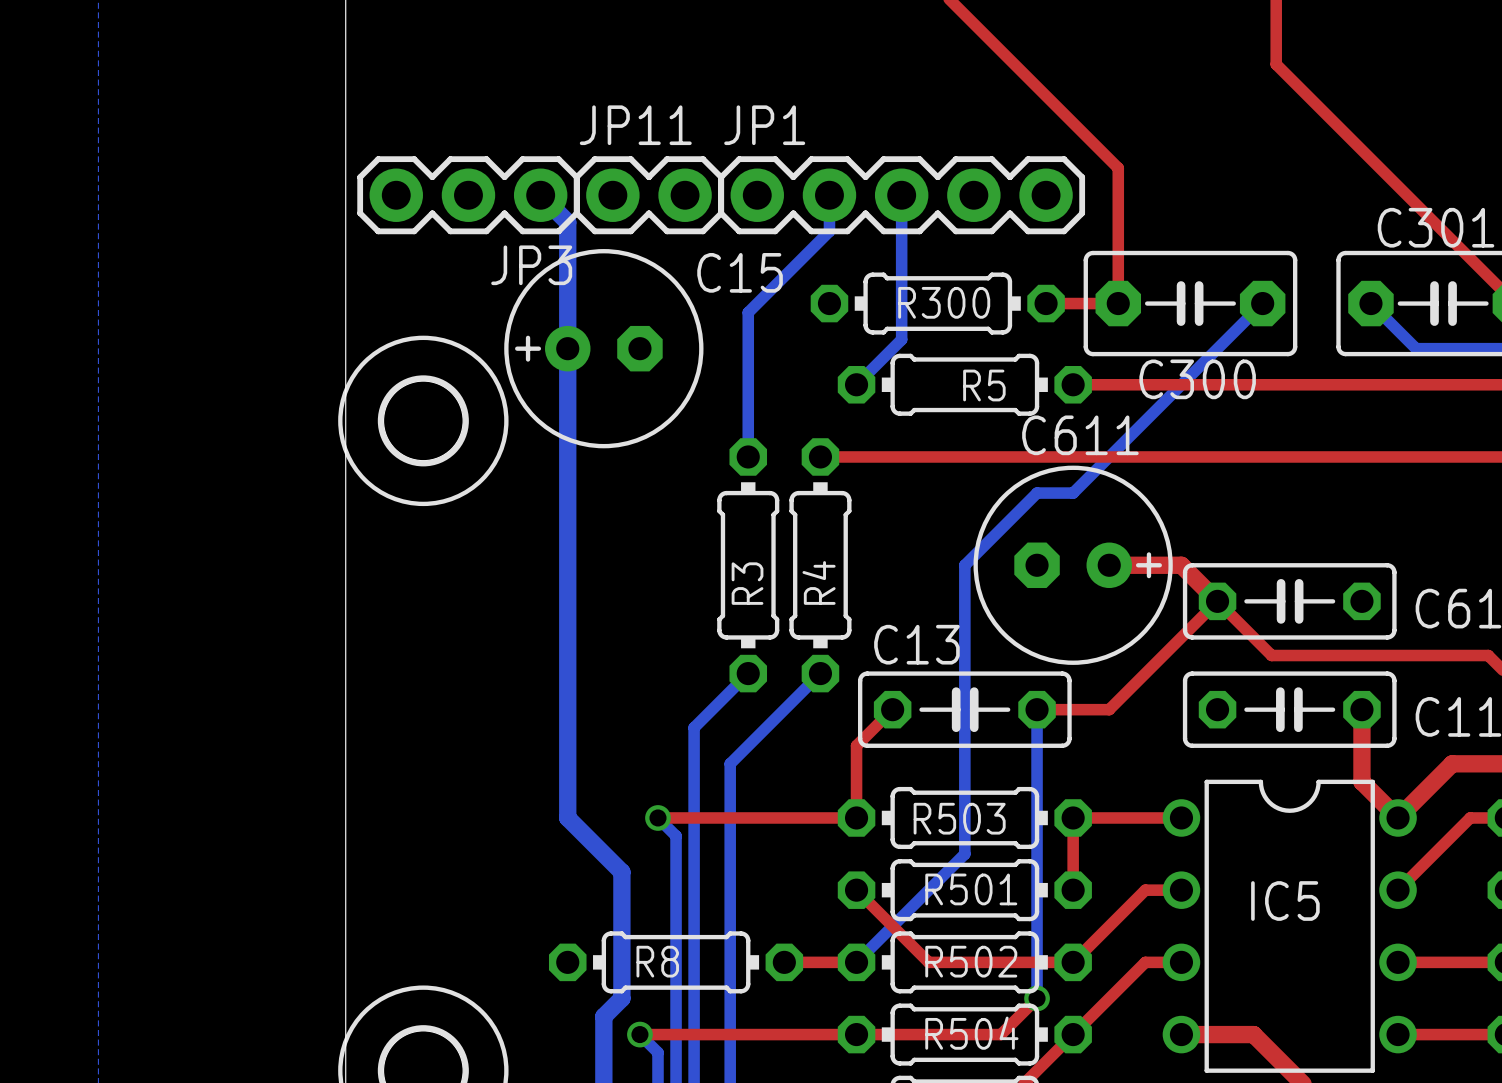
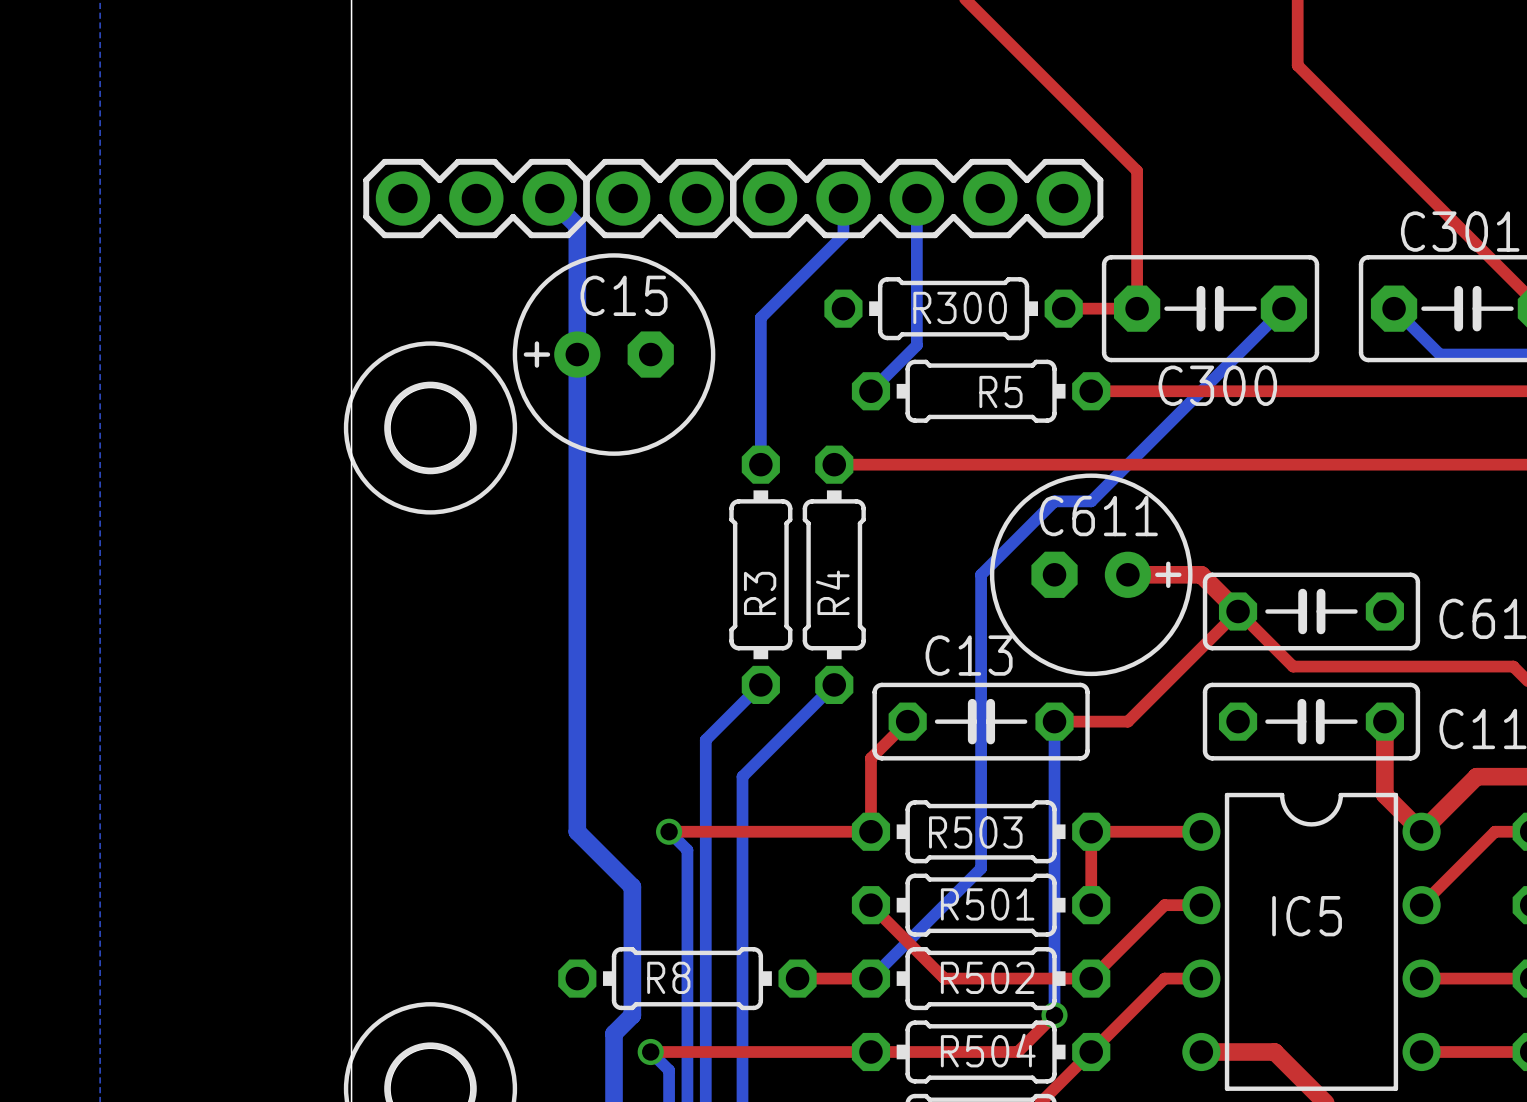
JP11 name: JP11 (635, 125) -> none
JP1 name: JP1 (764, 125) -> none
JP3 name: JP3 (531, 265) -> none
C15 name position: C15 (740, 272) -> C15 (624, 295)
C611 name position: C611 (1080, 435) -> C611 (1098, 516)
C13 name position: C13 (916, 644) -> C13 (969, 655)

